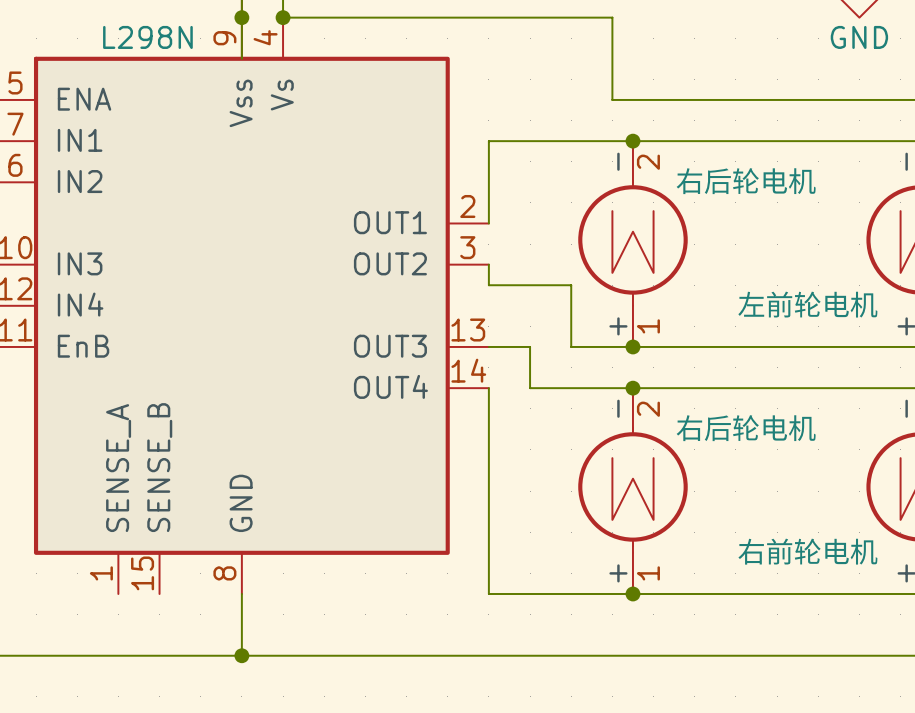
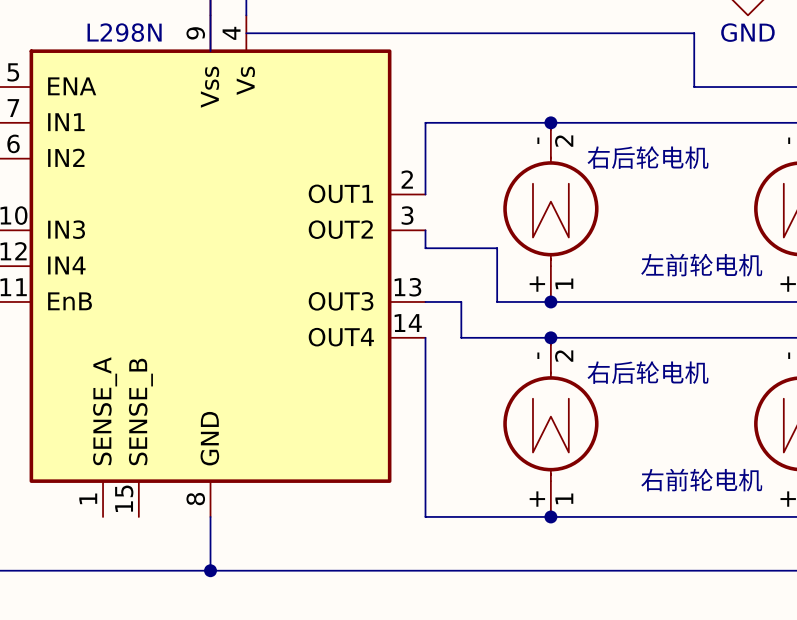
junction: (241, 17) -> none
wire: (283, 17) (612, 17) (612, 99) (797, 99) -> (246, 33) (694, 33) (694, 87)
junction: (283, 17) -> none

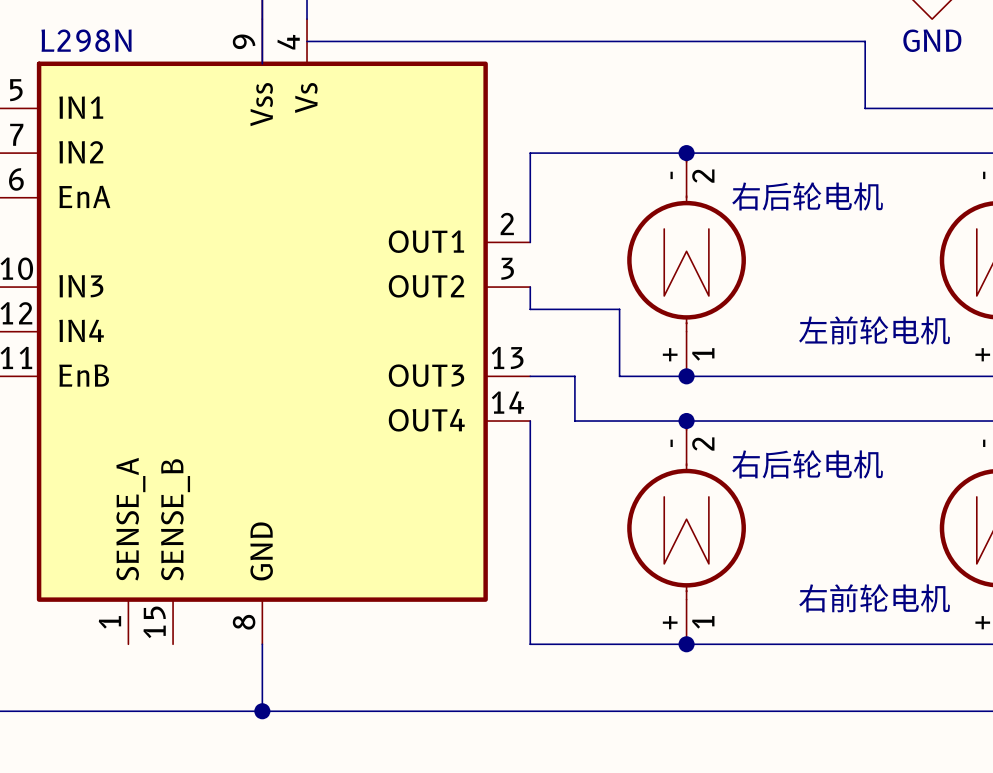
part value position: L298N (124, 32) -> L298N (86, 40)
part pin name: ENA (72, 86) -> IN1 (81, 107)
part pin name: IN1 (66, 122) -> IN2 (81, 152)
part pin name: IN2 (66, 157) -> EnA (84, 196)

